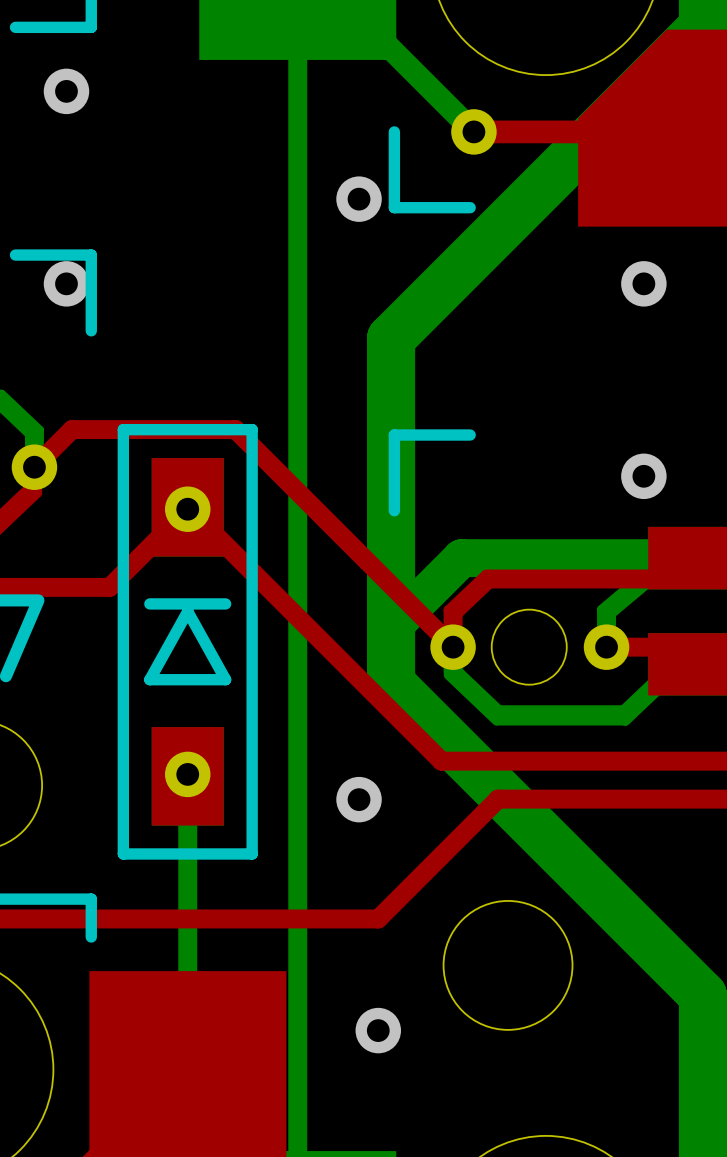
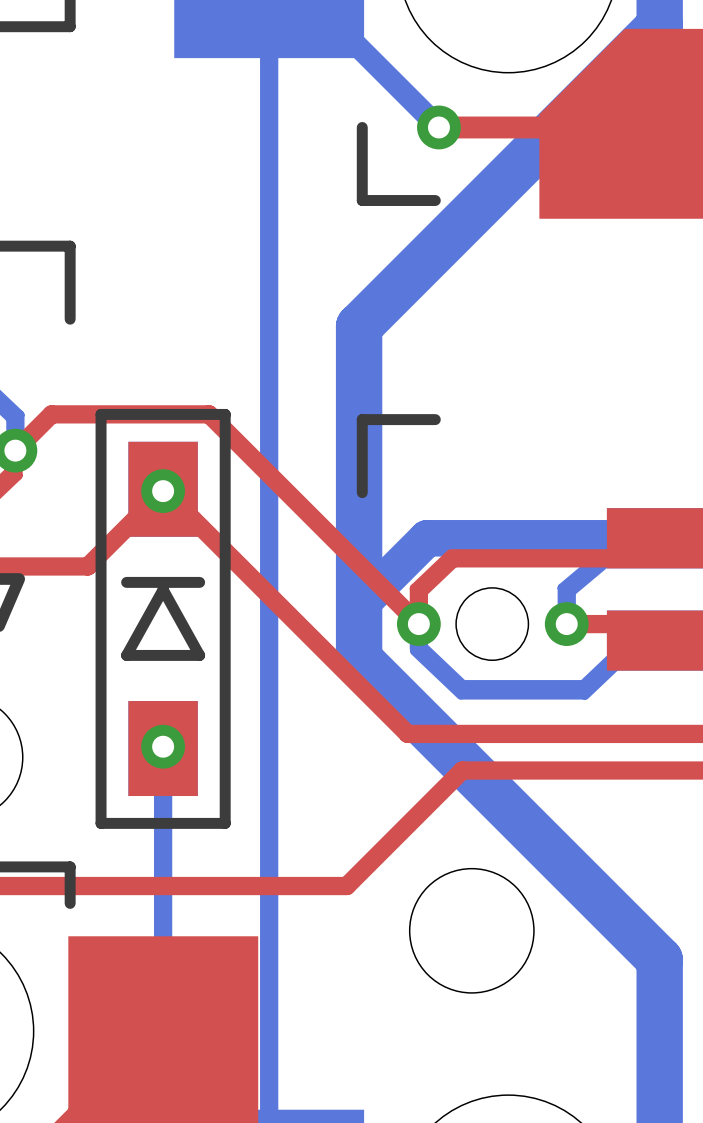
via: (66, 91) -> none
via: (359, 199) -> none
via: (66, 283) -> none
via: (643, 283) -> none
via: (643, 476) -> none
via: (359, 799) -> none
via: (378, 1030) -> none

